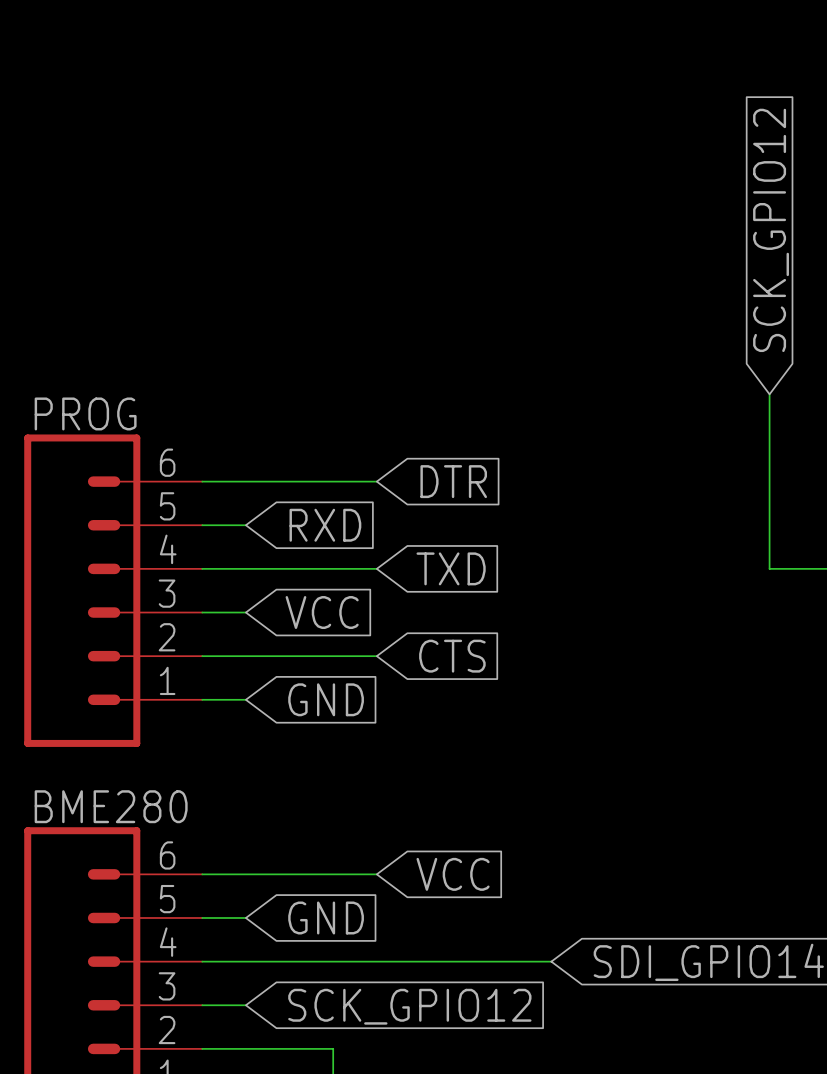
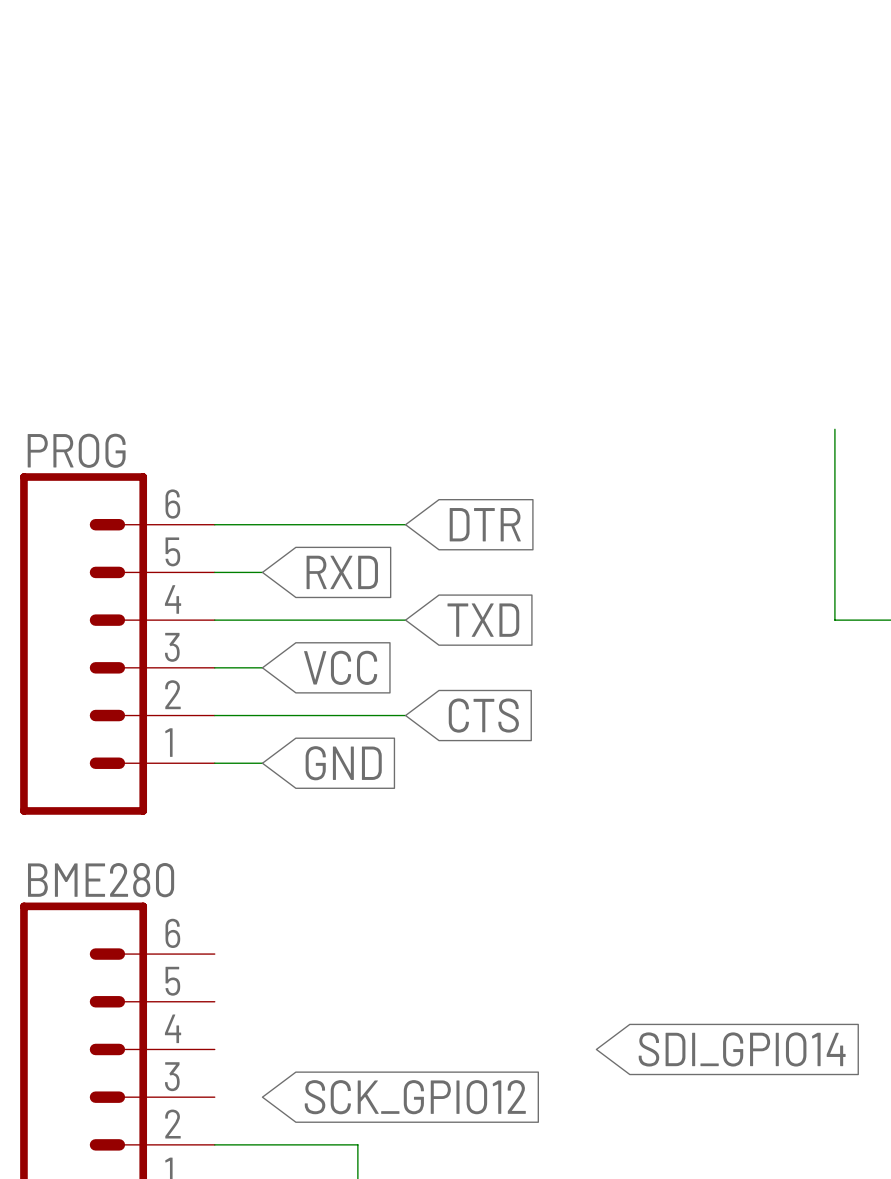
global label: SCK_GPIO12 (771, 230) -> none
wire: (202, 874) (376, 874) -> none
global label: VCC (453, 874) -> none
wire: (202, 917) (245, 917) -> none
global label: GND (326, 917) -> none
wire: (202, 961) (551, 961) -> none
wire: (202, 1005) (245, 1005) -> none

